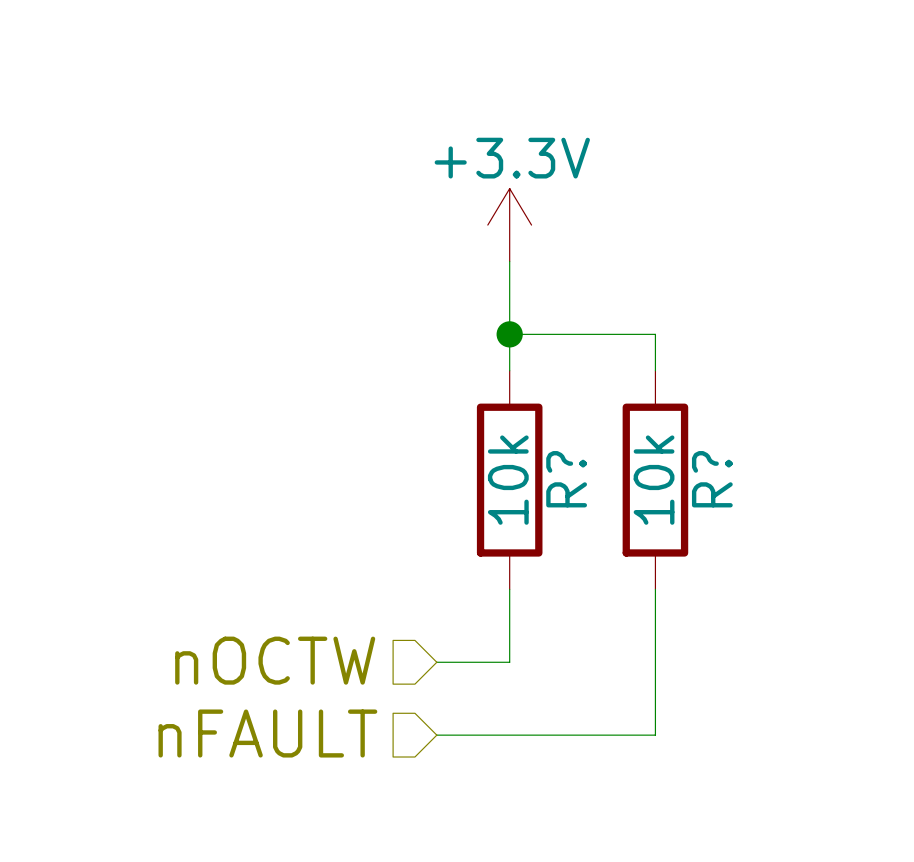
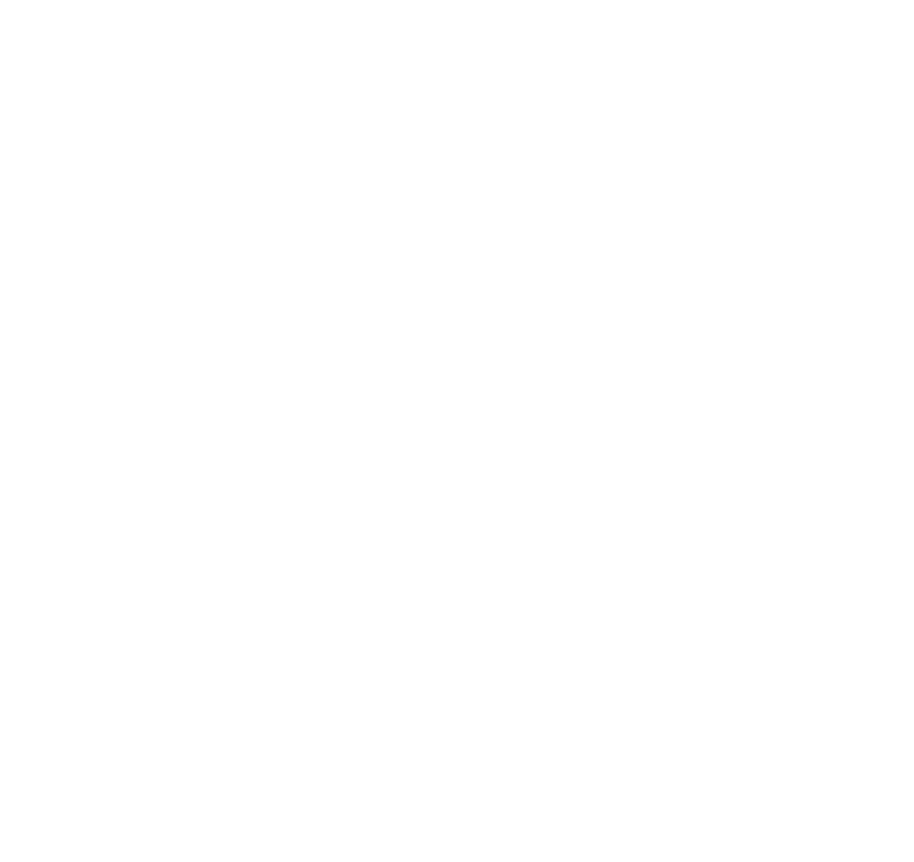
power symbol: +3.3V (509, 225) -> none
wire: (509, 261) (509, 370) -> none
wire: (509, 334) (655, 334) (655, 370) -> none
junction: (509, 334) -> none
R?: 10k (509, 480) -> none
R?: 10k (655, 480) -> none
wire: (509, 589) (509, 662) (436, 662) -> none
wire: (655, 589) (655, 735) (436, 735) -> none
hierarchical label: nOCTW (275, 660) -> none
hierarchical label: nFAULT (267, 733) -> none

